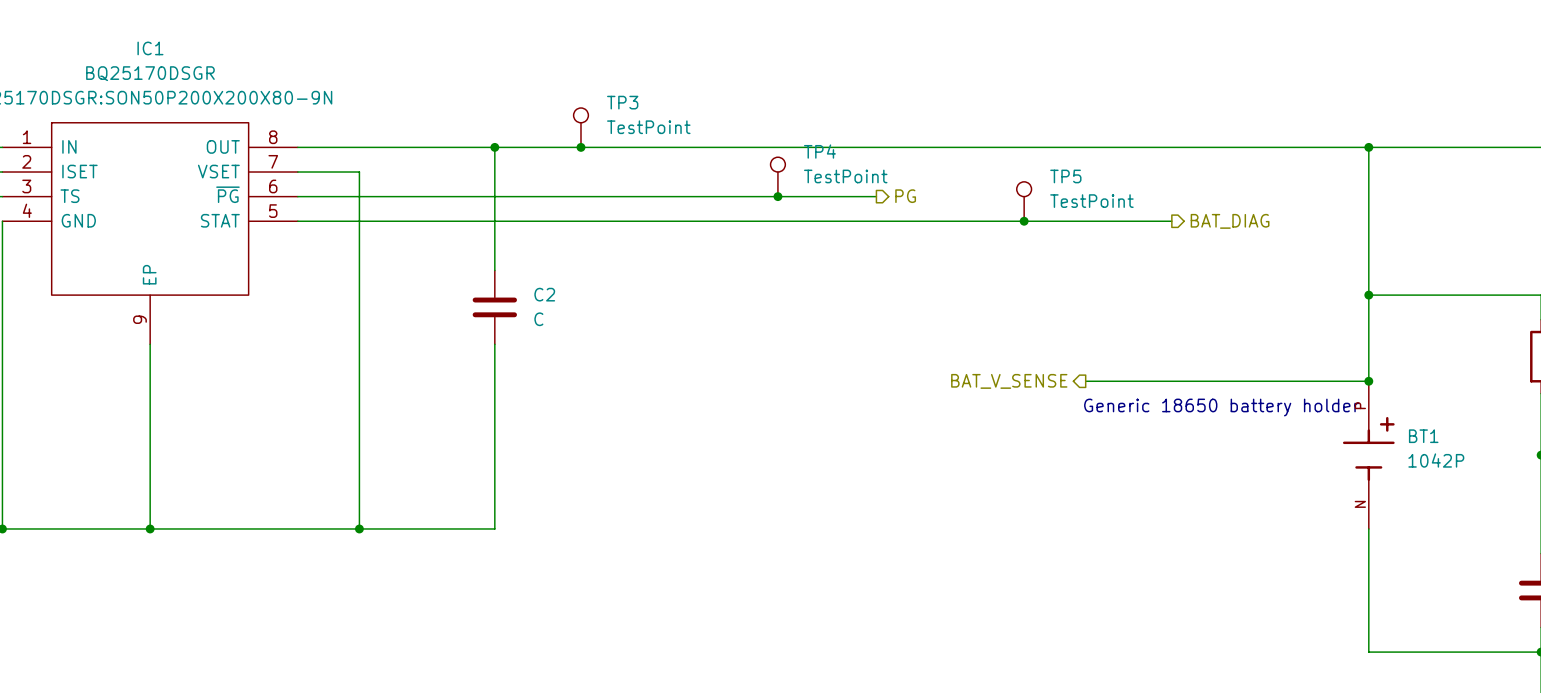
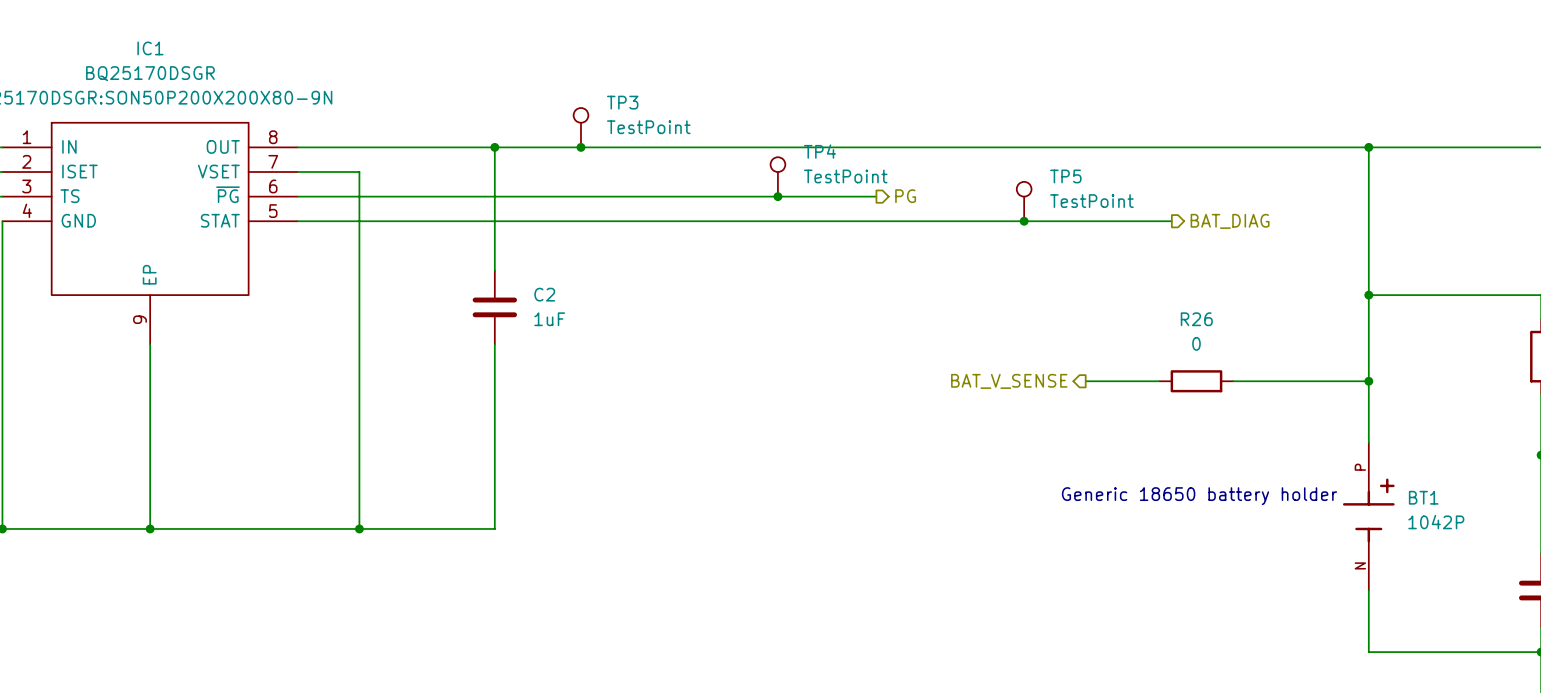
C2 value: C (538, 319) -> 1uF (549, 319)
wire: (1159, 381) (1233, 381) -> none
R26: none -> 0 (1196, 381)
text position: Generic 18650 battery holder (1221, 407) -> Generic 18650 battery holder (1199, 496)
BT1 position: (1368, 455) -> (1368, 516)

